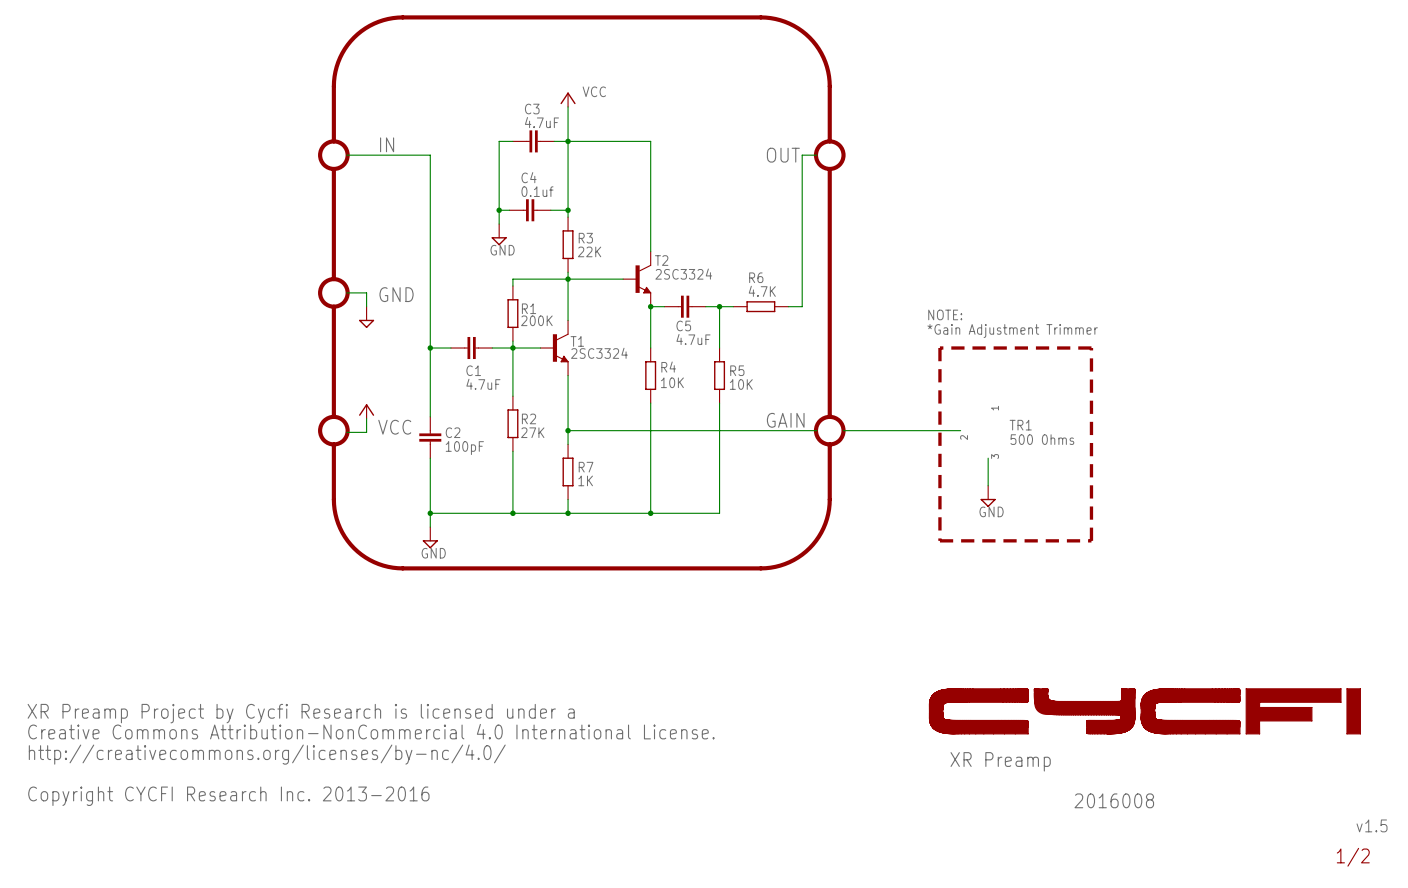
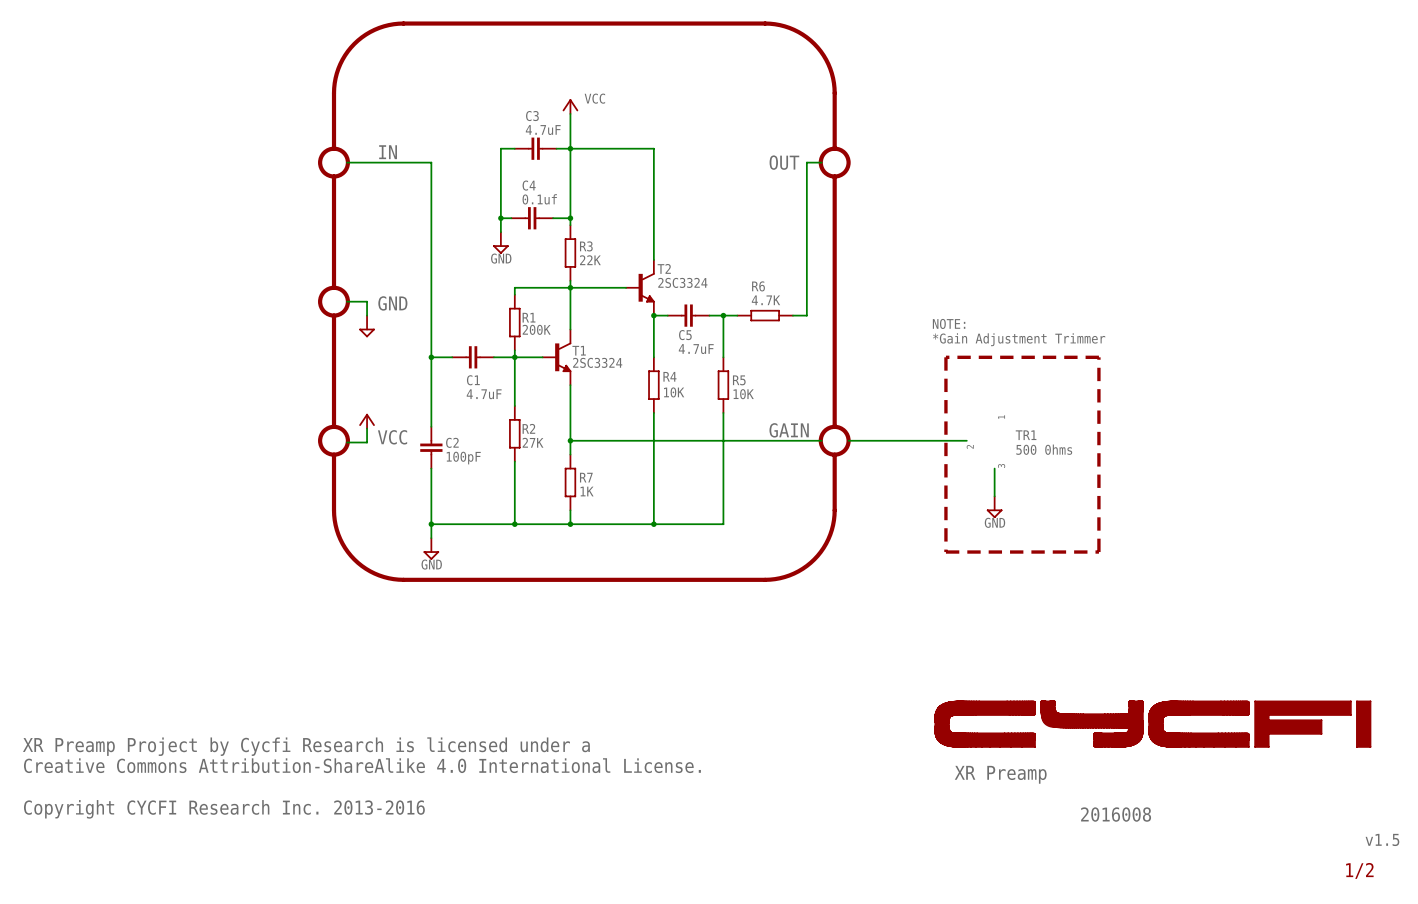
text: XR Preamp Project by Cycfi Research is licensed under a (301, 713) -> none
text: Creative Commons Attribution-NonCommercial 4.0 International License. (371, 731) -> XR Preamp Project by Cycfi Research is licensed under a (306, 746)
text: http://creativecommons.org/licenses/by-nc/4.0/ (267, 754) -> Creative Commons Attribution-ShareAlike 4.0 International License. (362, 765)

